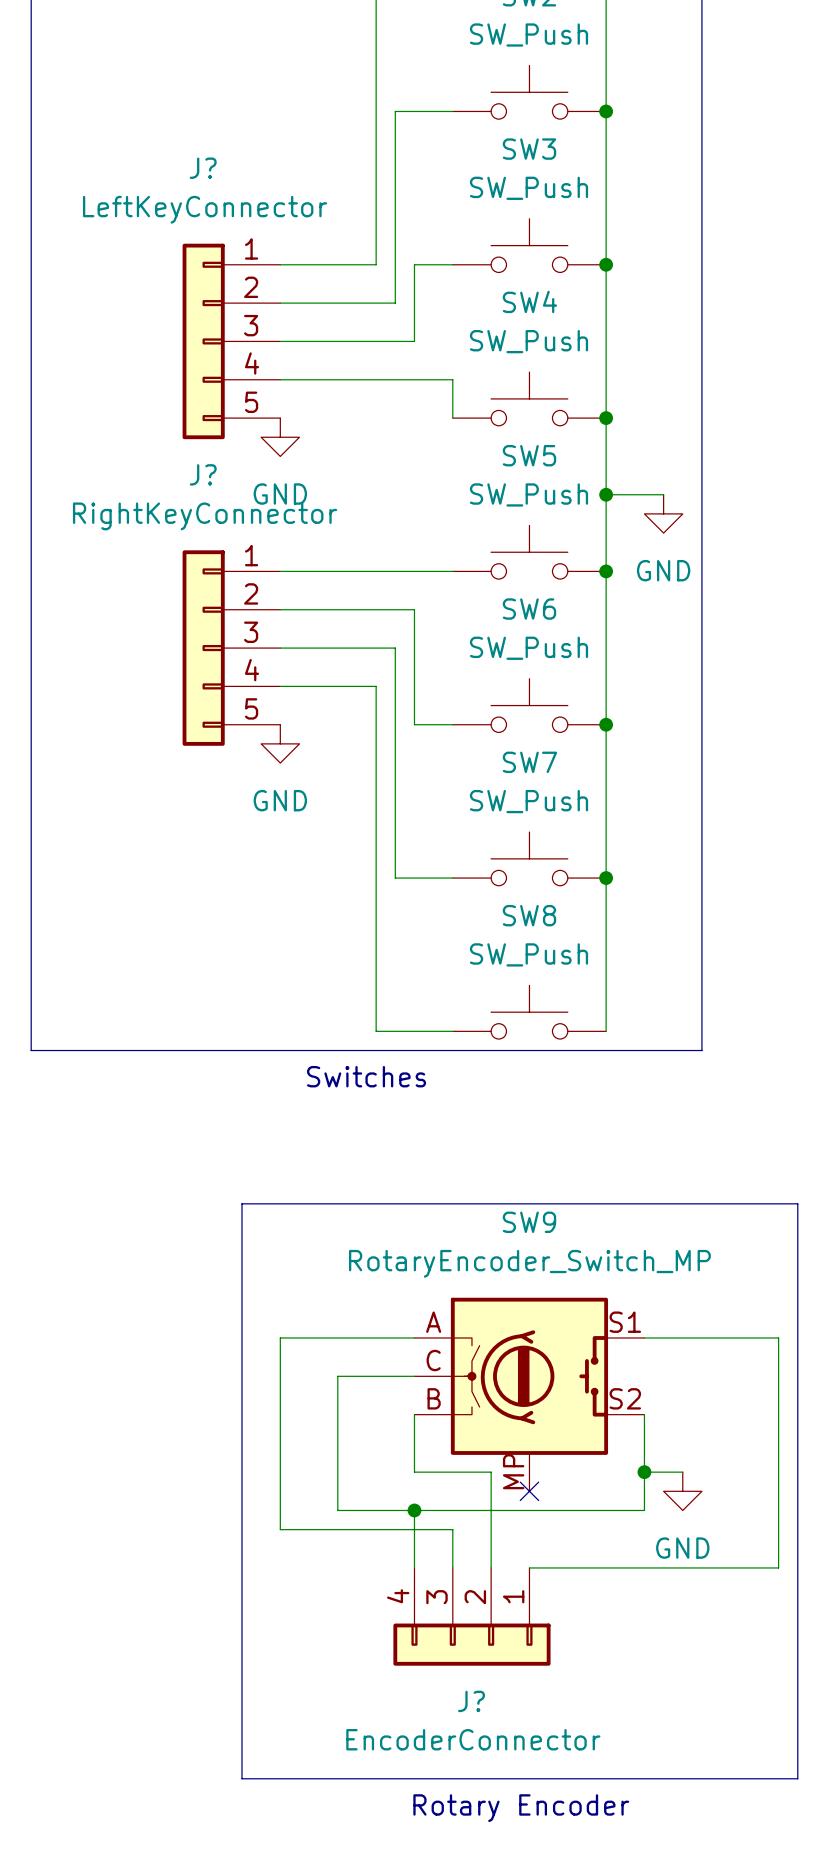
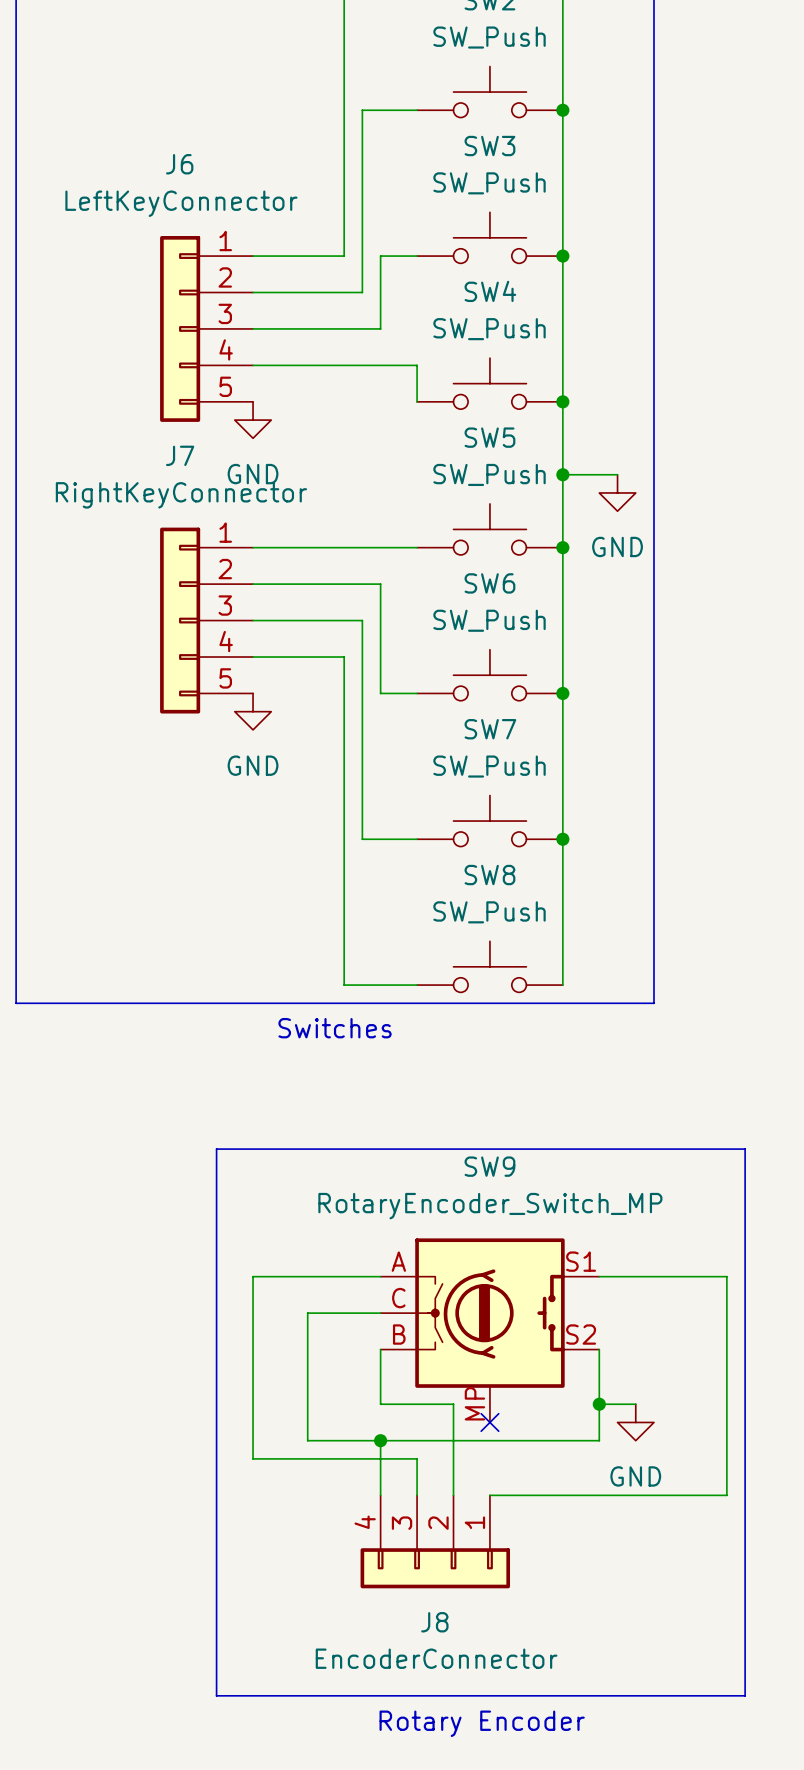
J? name: J? (203, 168) -> J6 (179, 164)
J? name: J? (203, 474) -> J7 (180, 455)
J? name: J? (471, 1701) -> J8 (434, 1622)

